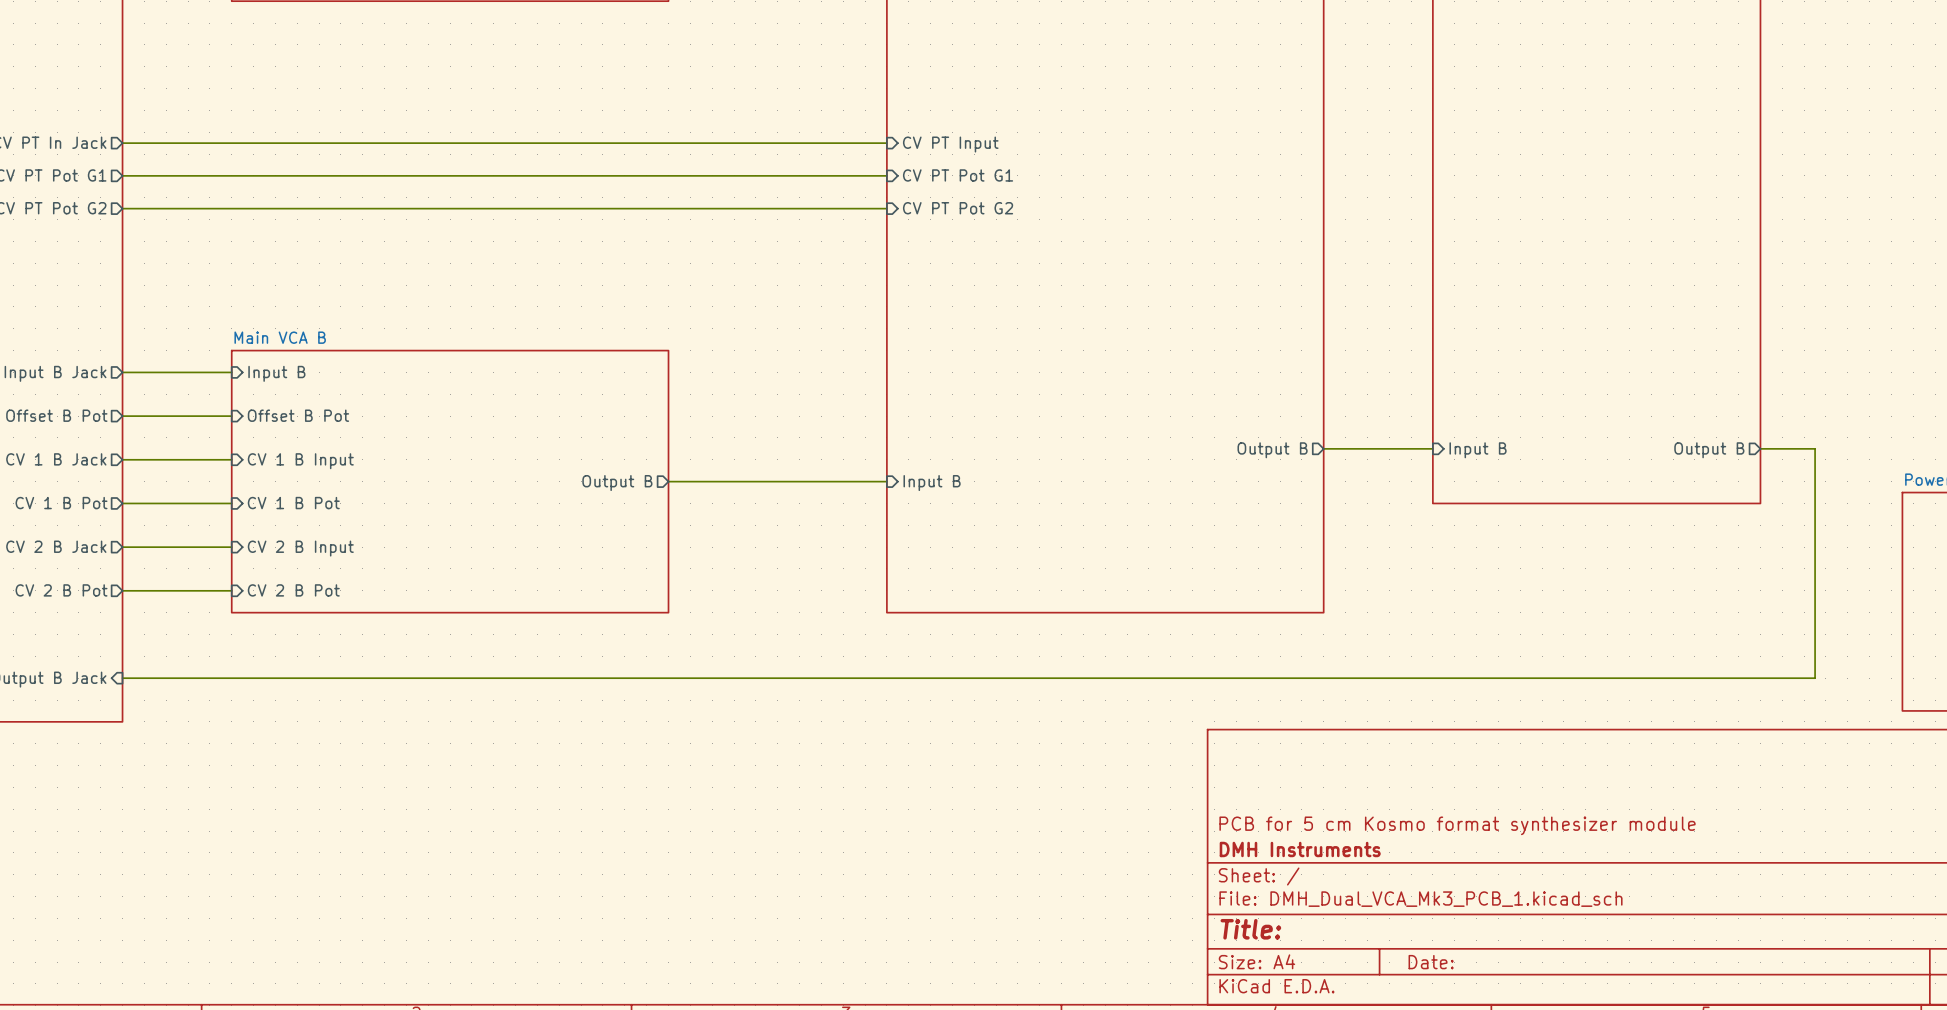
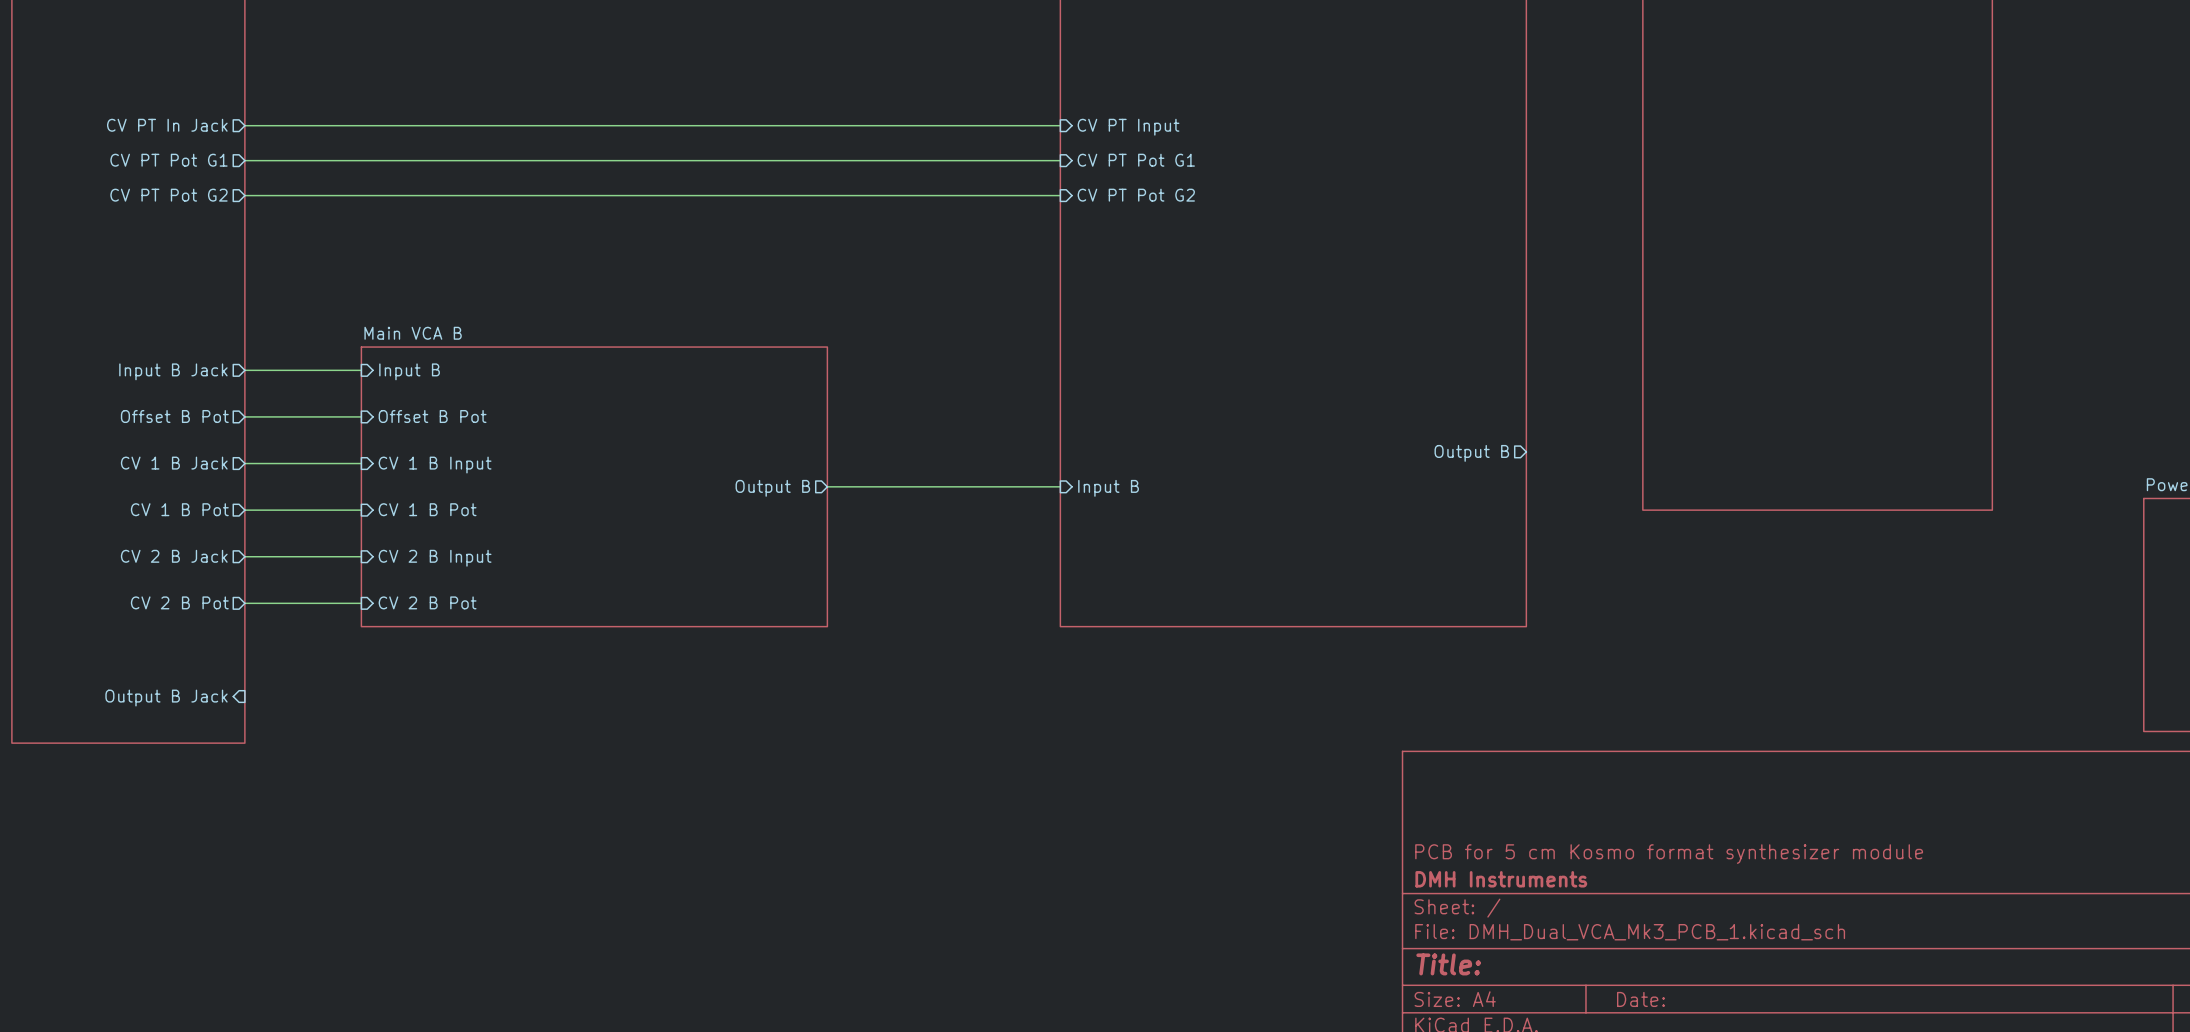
wire: (1323, 448) (1432, 448) -> none
wire: (1760, 448) (1815, 448) (1815, 678) (122, 678) -> none
sheet pin: Input B (1478, 450) -> none
sheet pin: Output B (1709, 450) -> none

